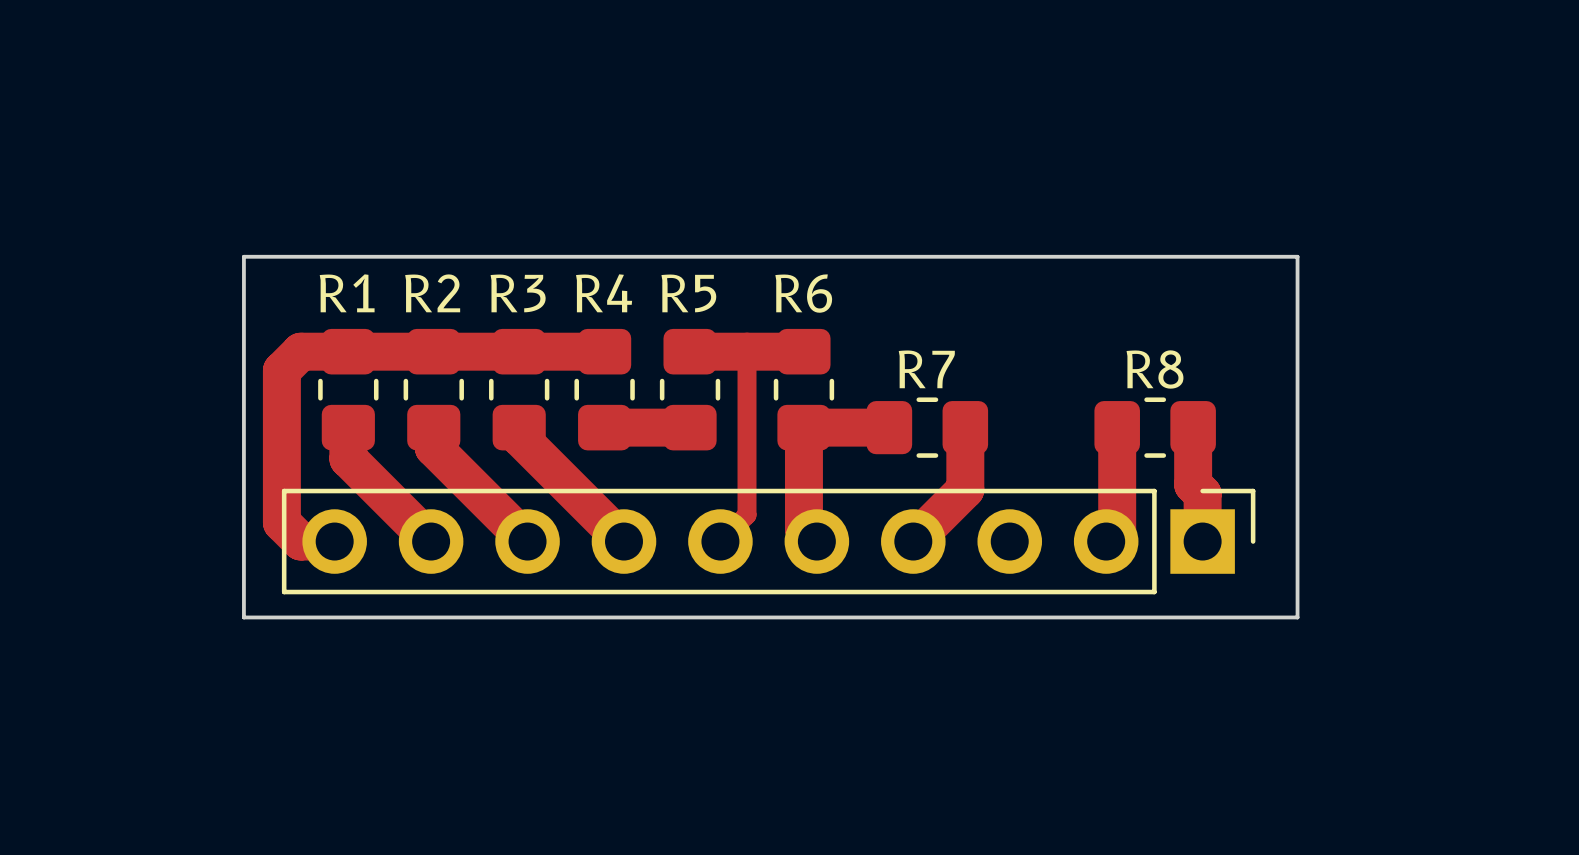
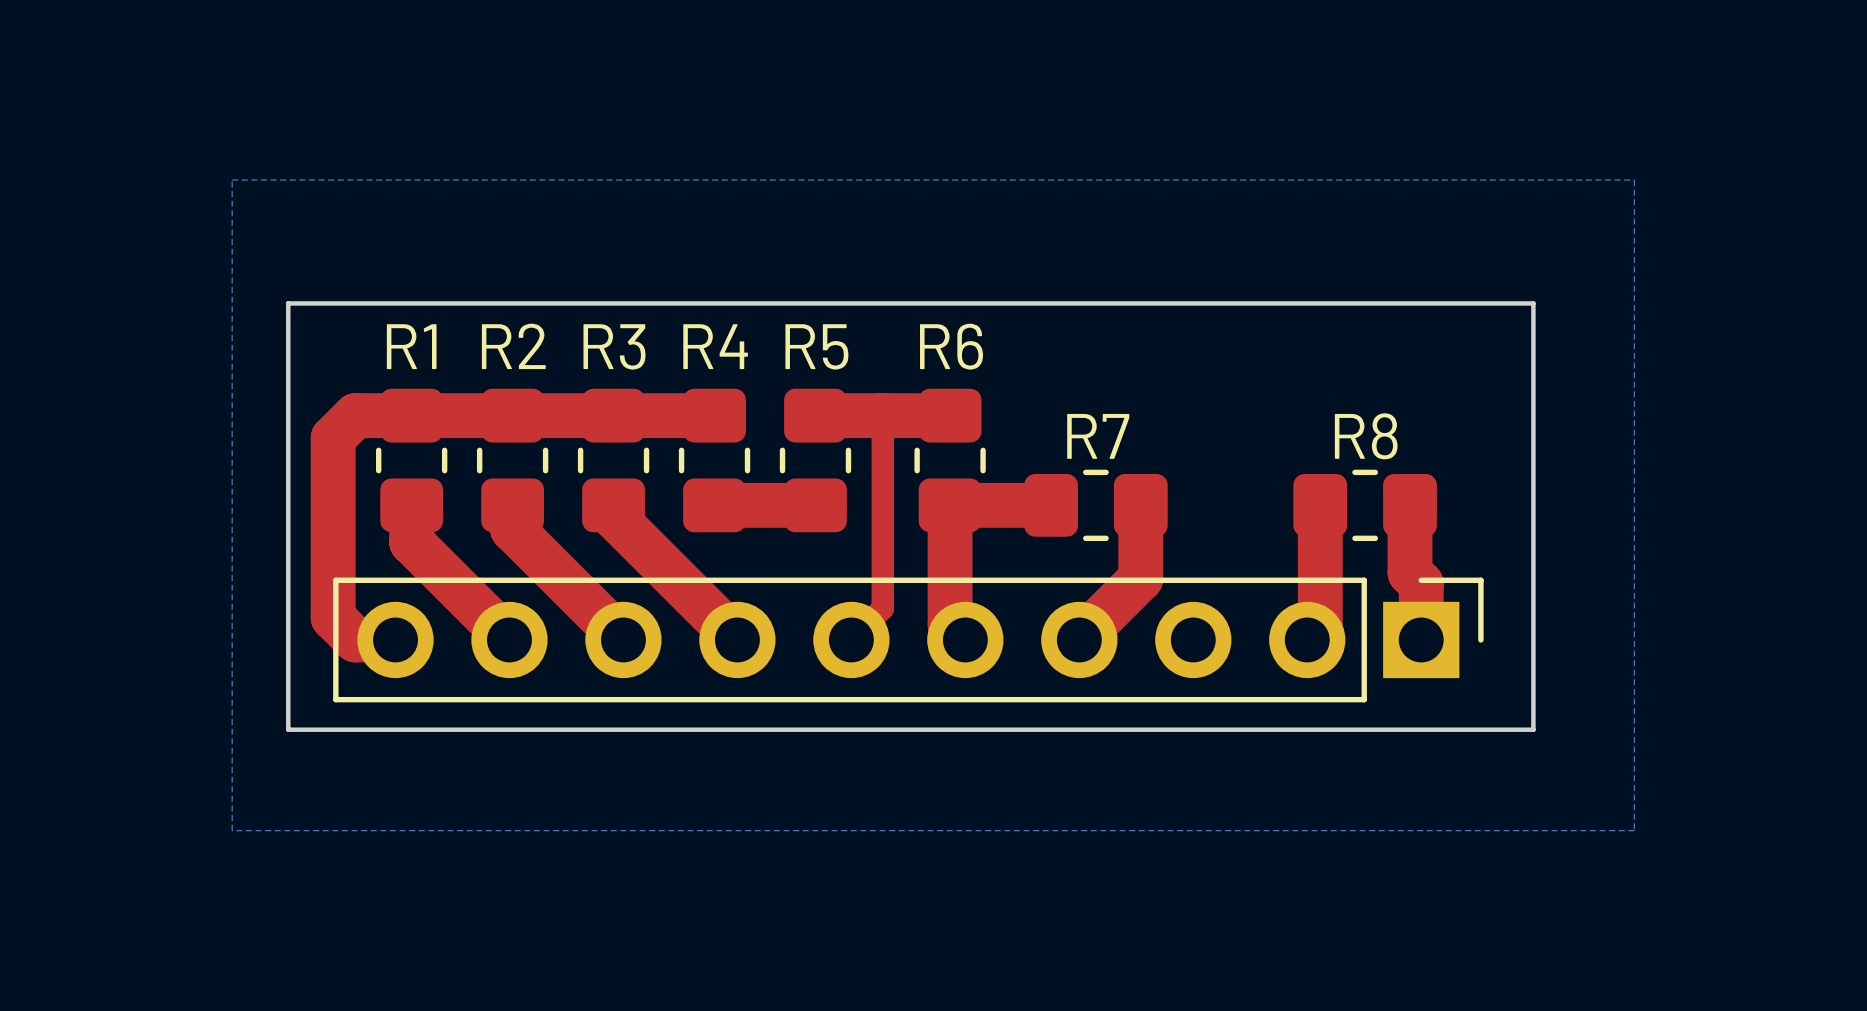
bottom zone outline: none -> (232, 180) (232, 830) (1634, 830) (1634, 180) (232, 180)

